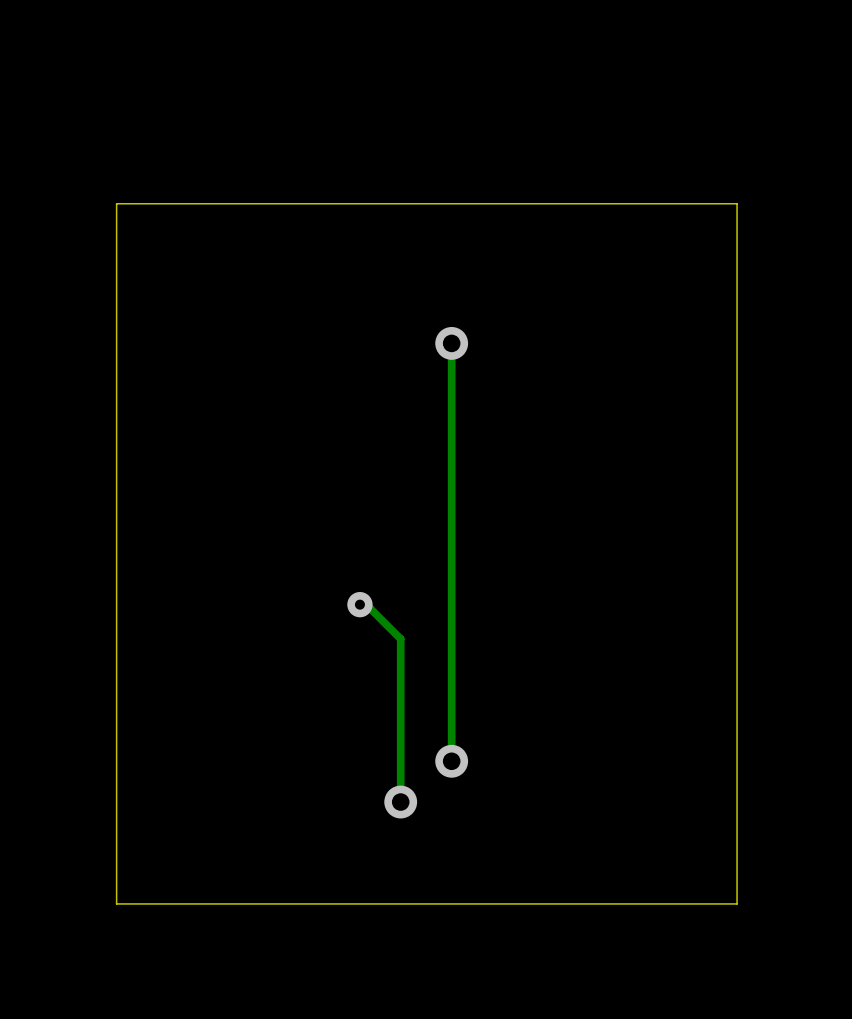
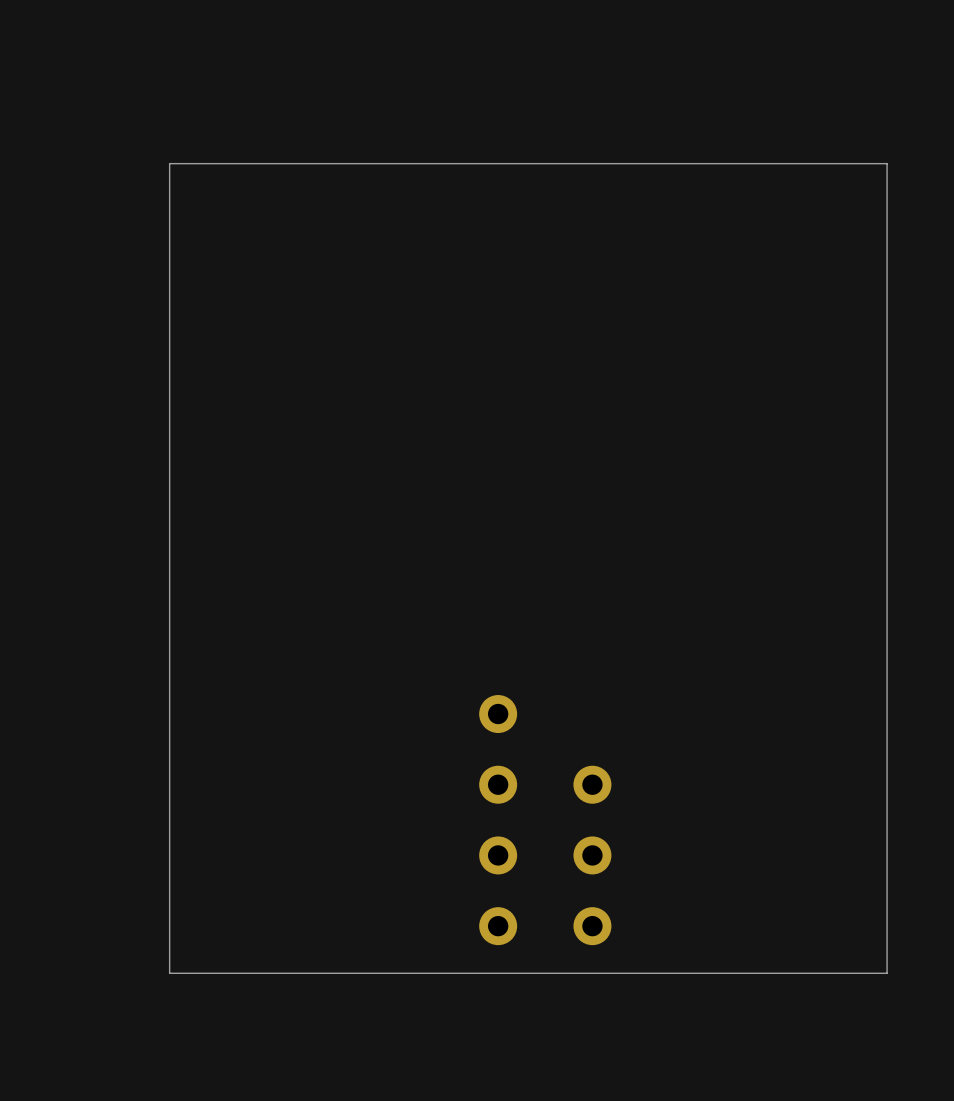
track: (451, 343) (451, 761) -> none
via: (451, 343) -> none
track: (359, 604) (363, 608) (370, 608) (400, 638) (400, 802) -> none
via: (359, 604) -> none
via: none -> (498, 714)
via: none -> (498, 784)
via position: (451, 761) -> (592, 784)
via: none -> (592, 855)
via: none -> (498, 926)
via: none -> (592, 926)

